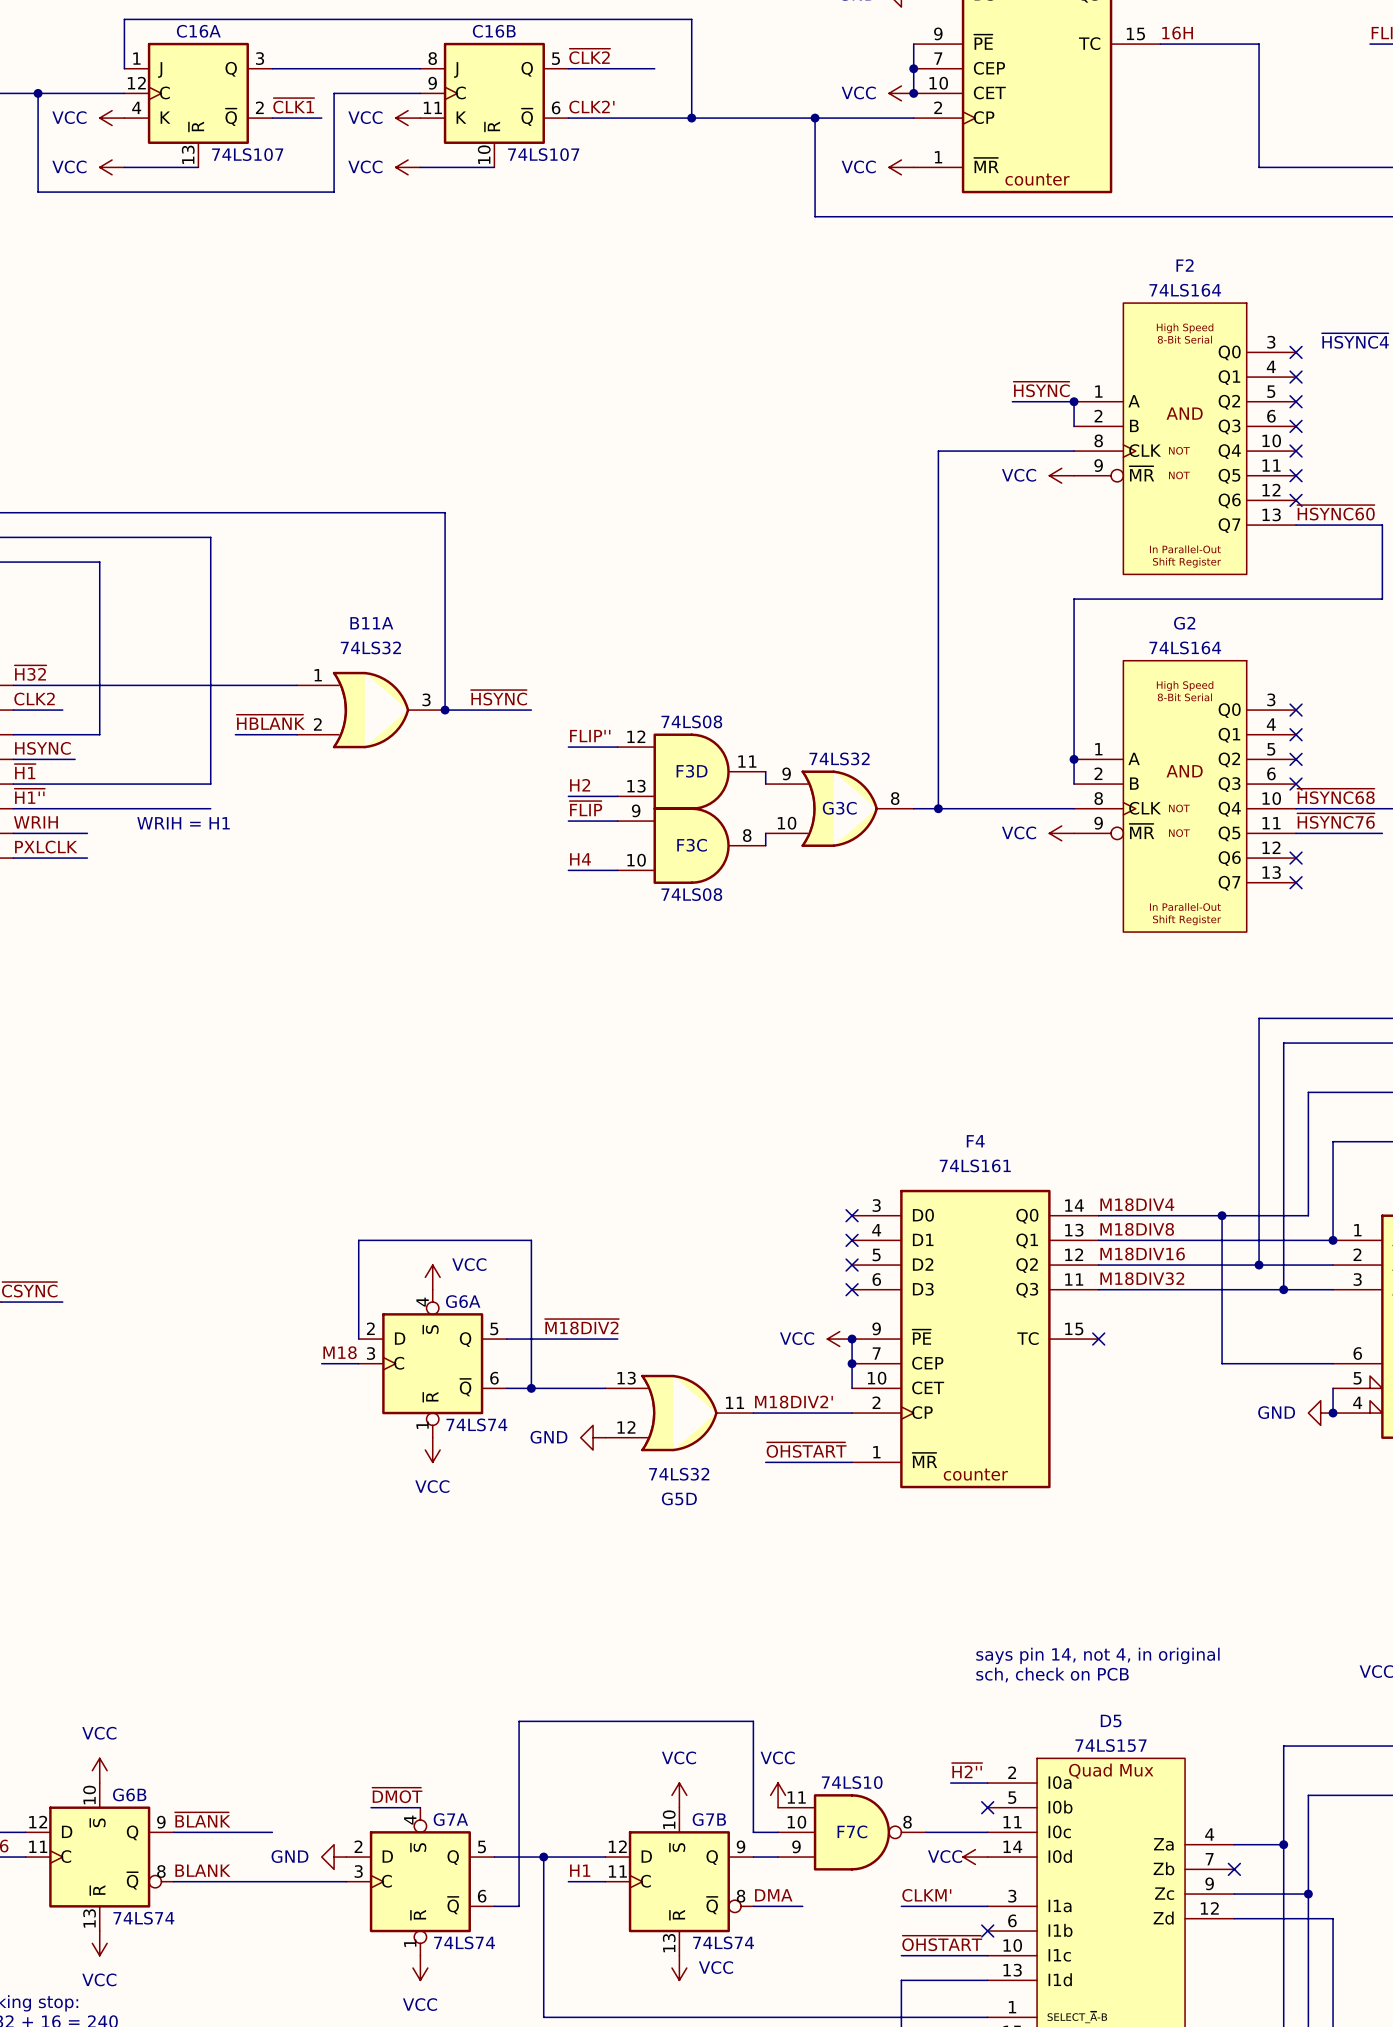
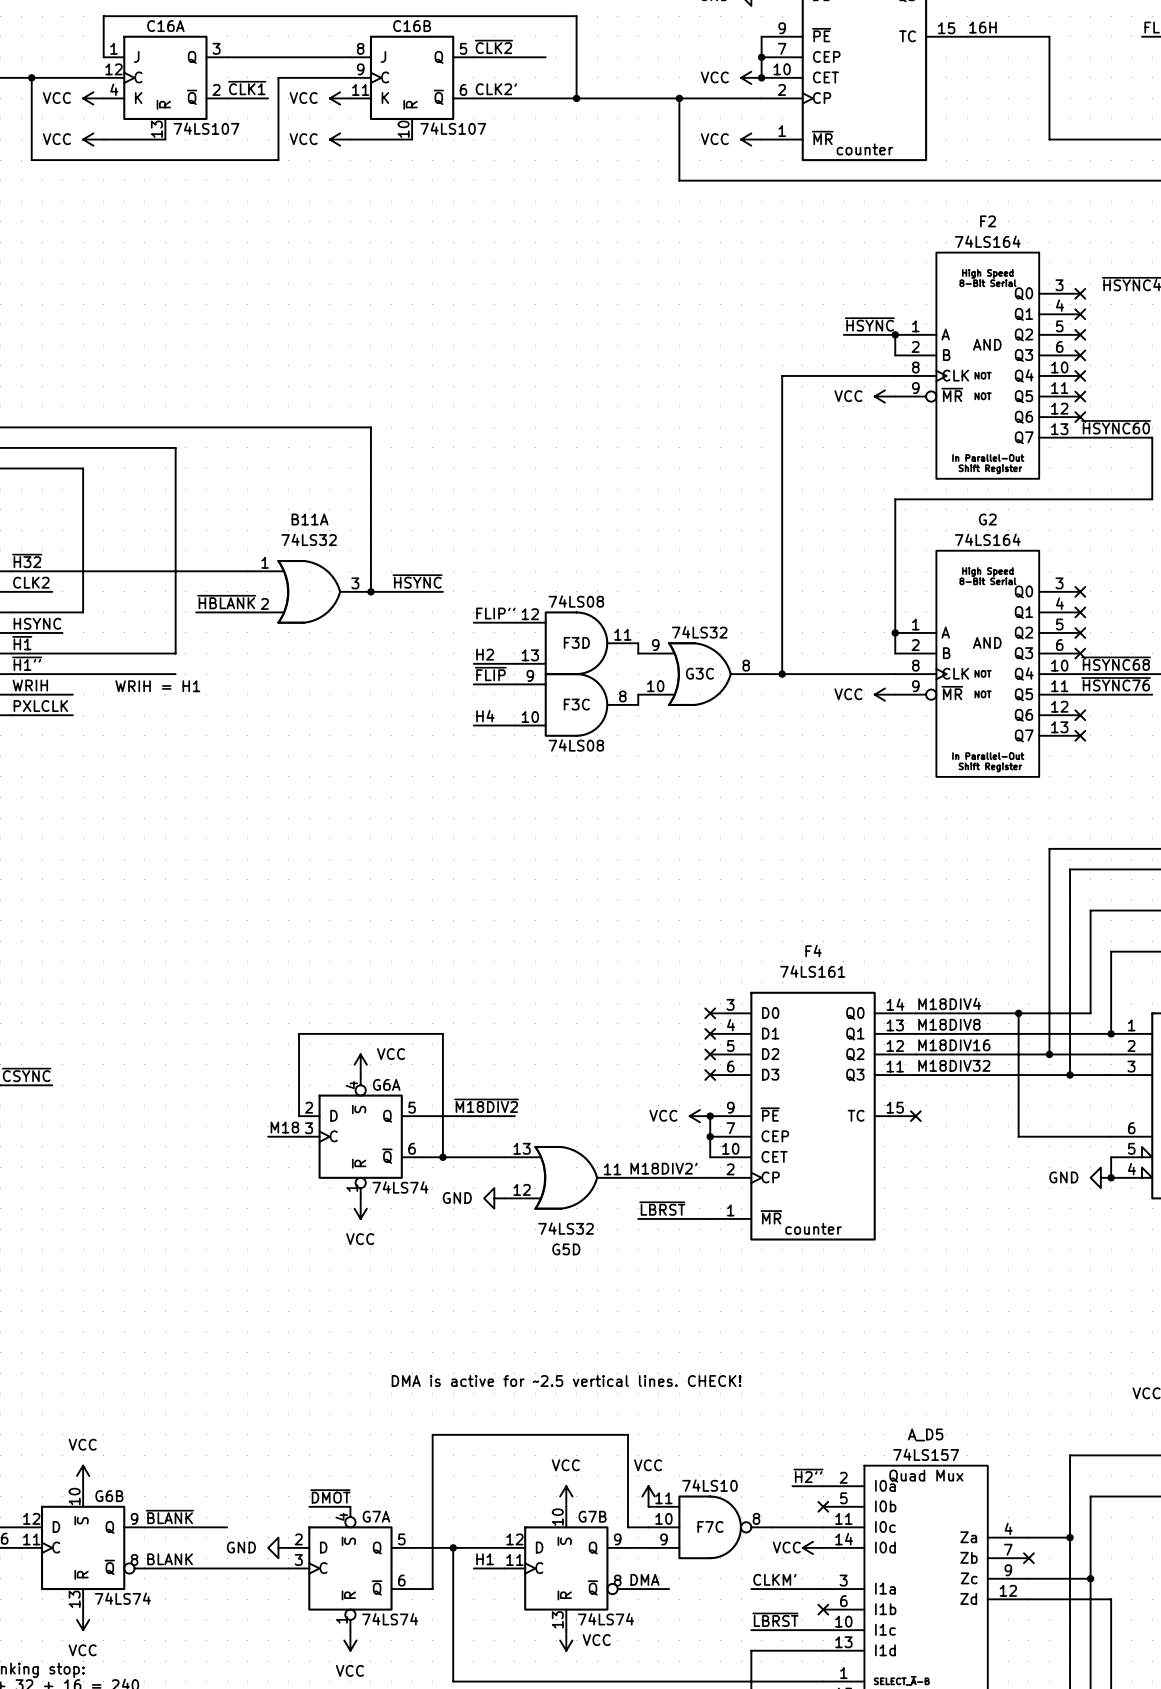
label: ~{OHSTART} (806, 1450) -> ~{LBRST} (662, 1208)
text: says pin 14, not 4, in original (1097, 1655) -> none
text: none -> DMA is active for ~2.5 vertical lines. CHECK! (566, 1381)
text: sch, check on PCB (1052, 1674) -> none
D5 name: D5 (1111, 1721) -> A_D5 (925, 1434)
label: ~{OHSTART} (942, 1943) -> ~{LBRST} (775, 1619)

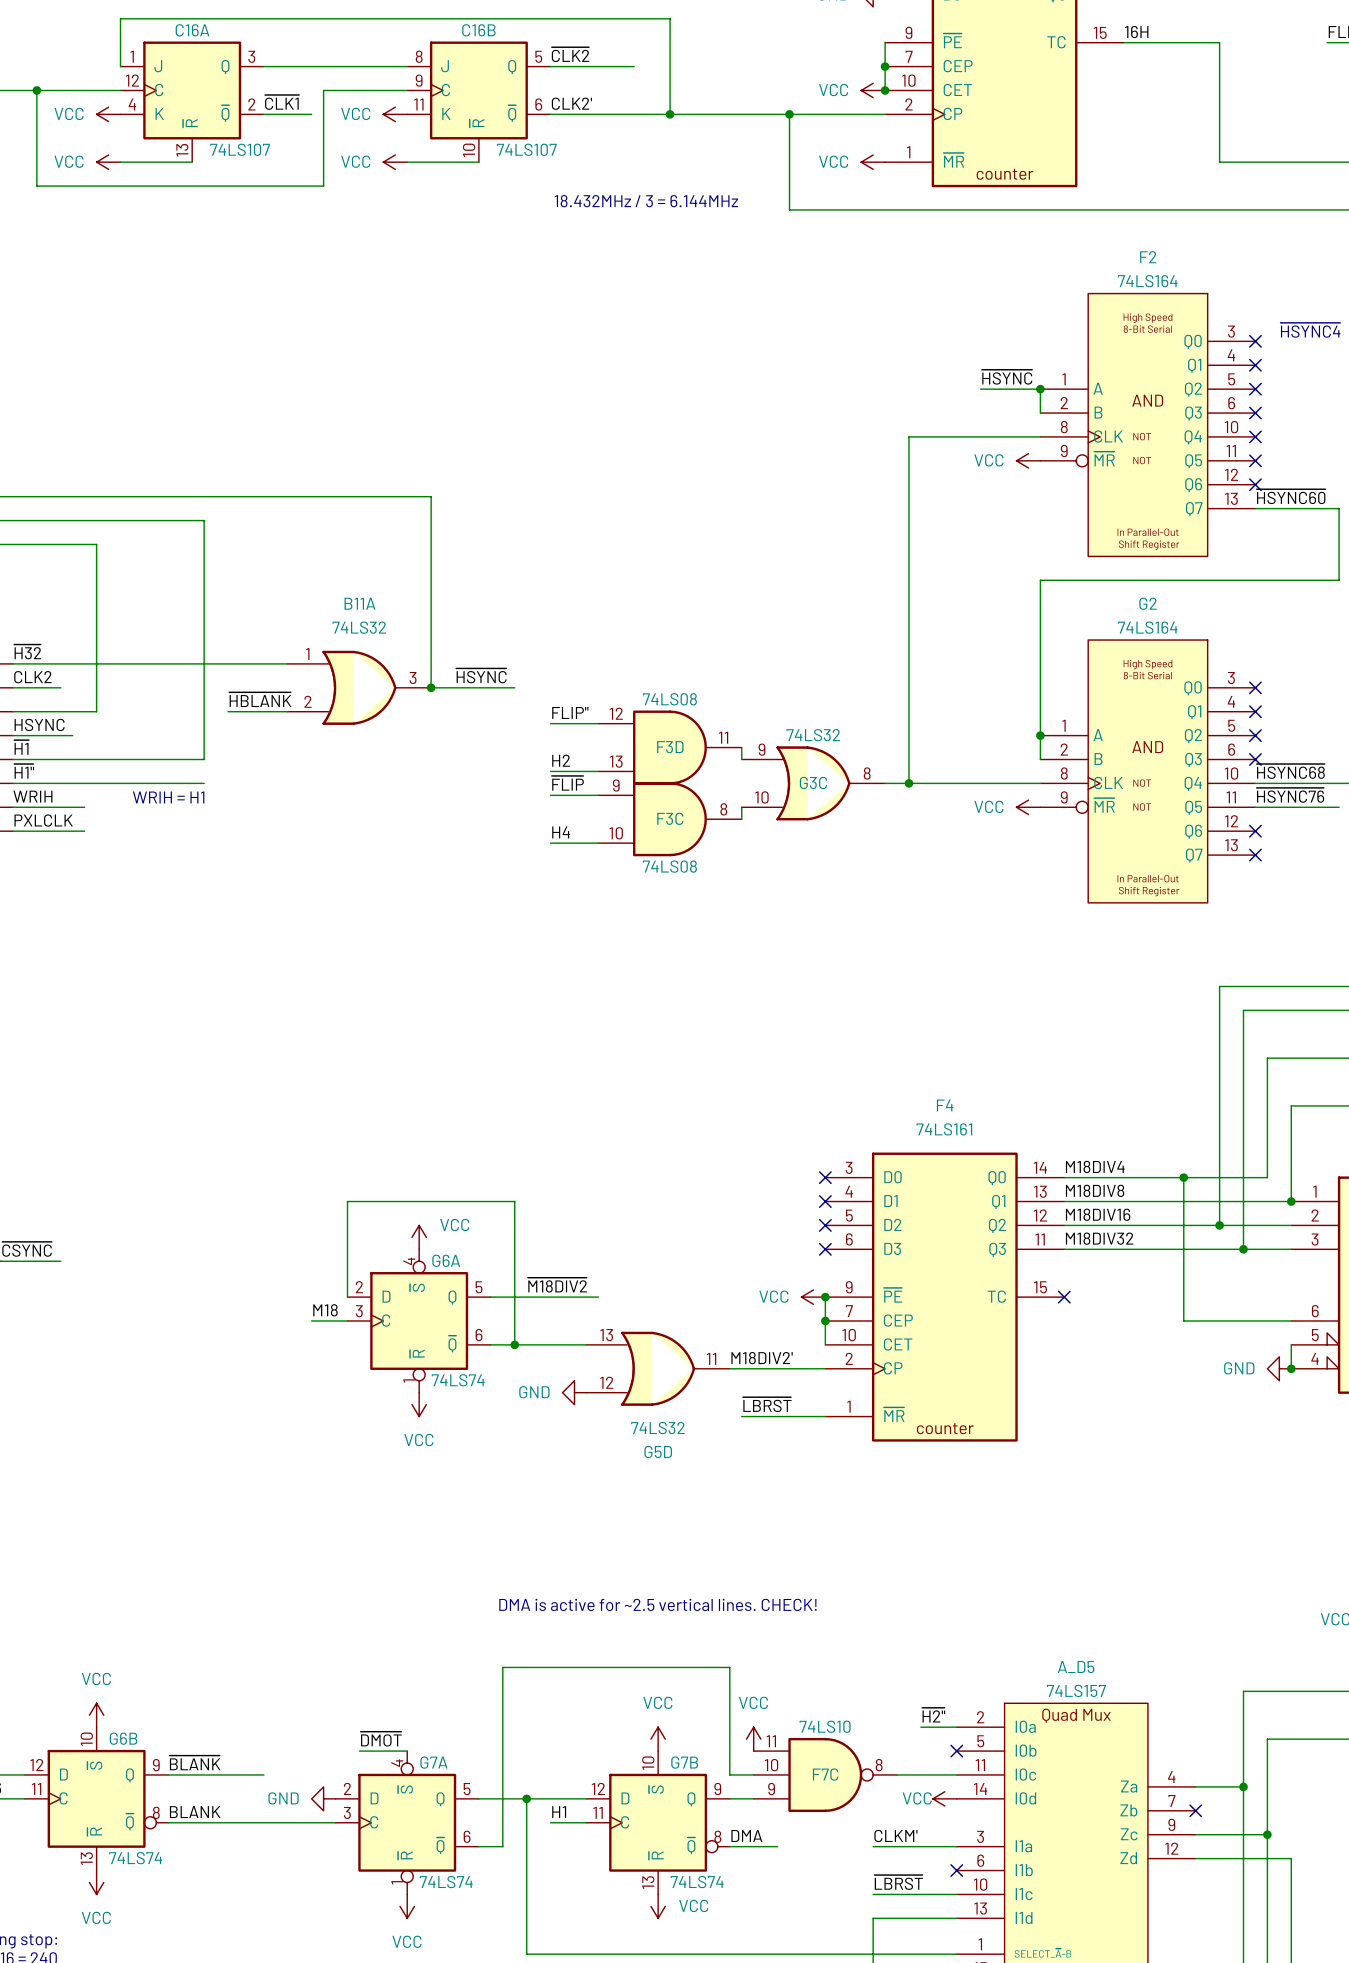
text: none -> 18.432MHz / 3 = 6.144MHz (646, 201)

